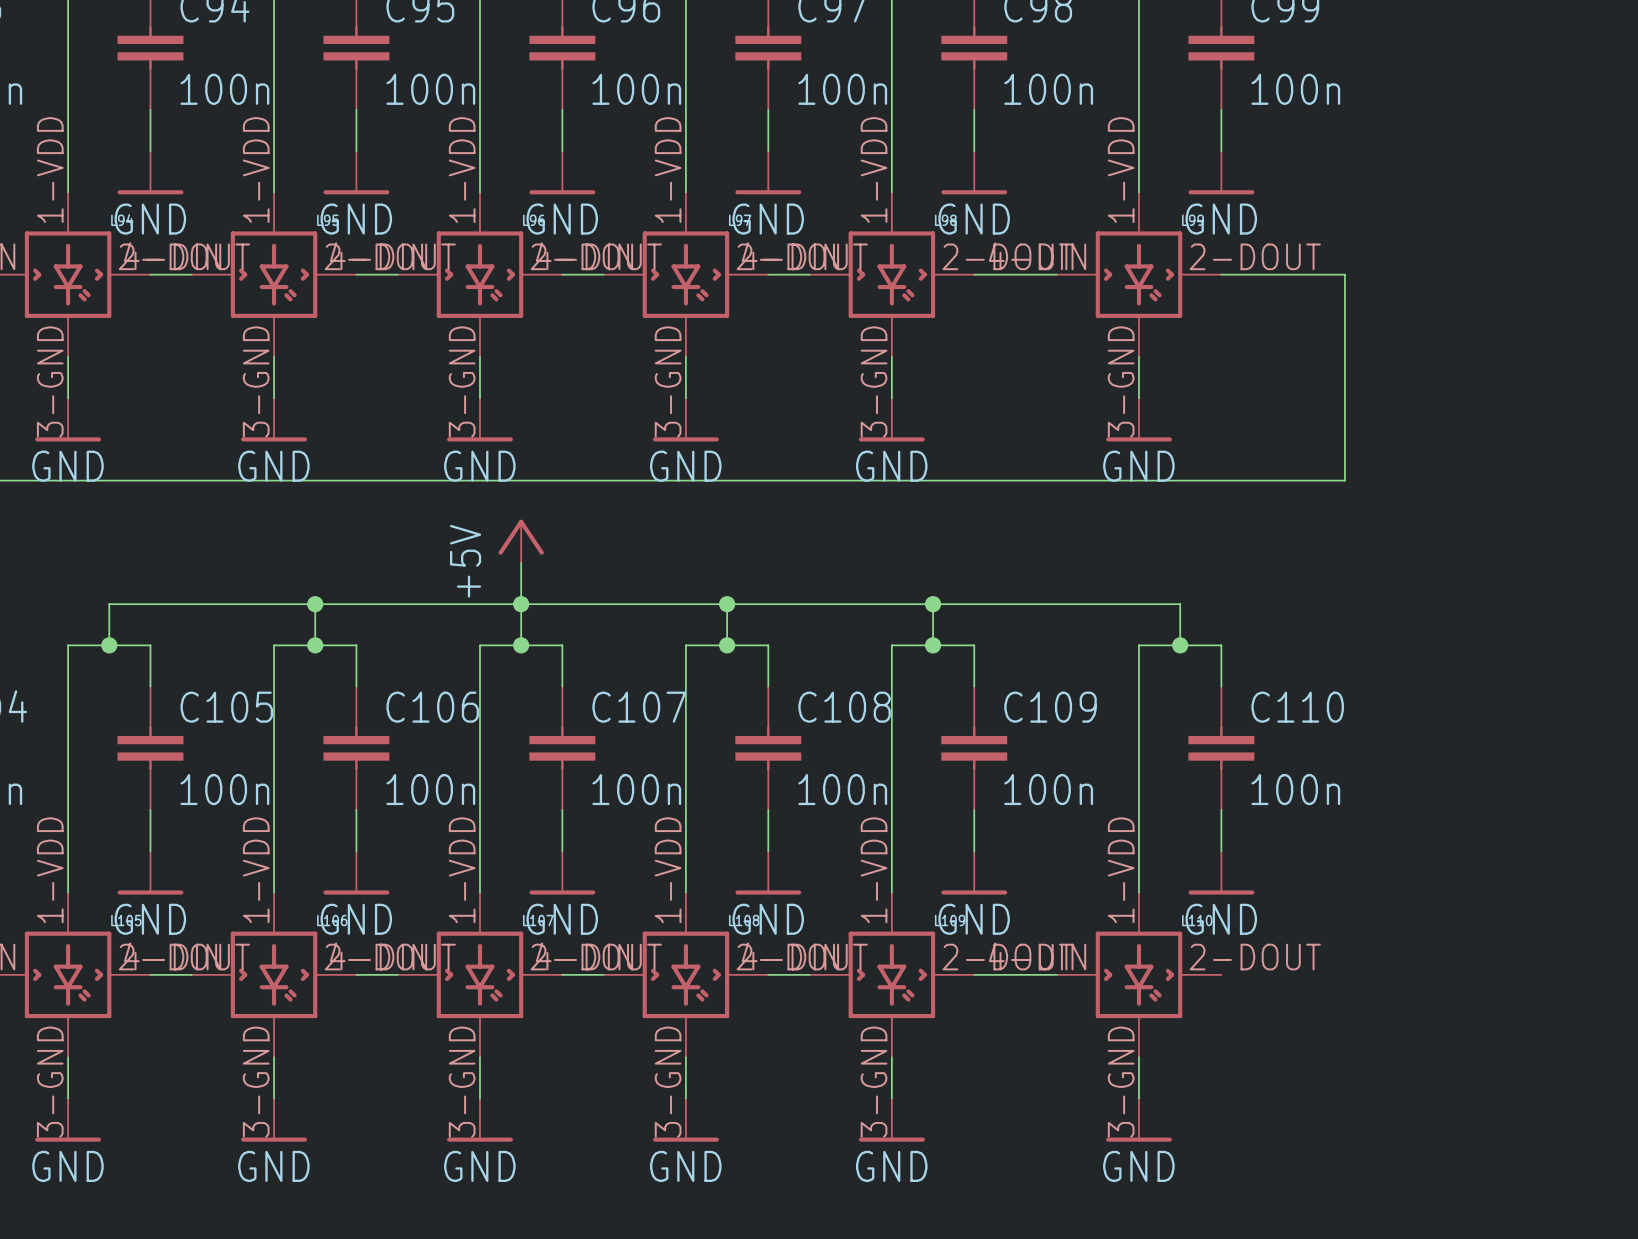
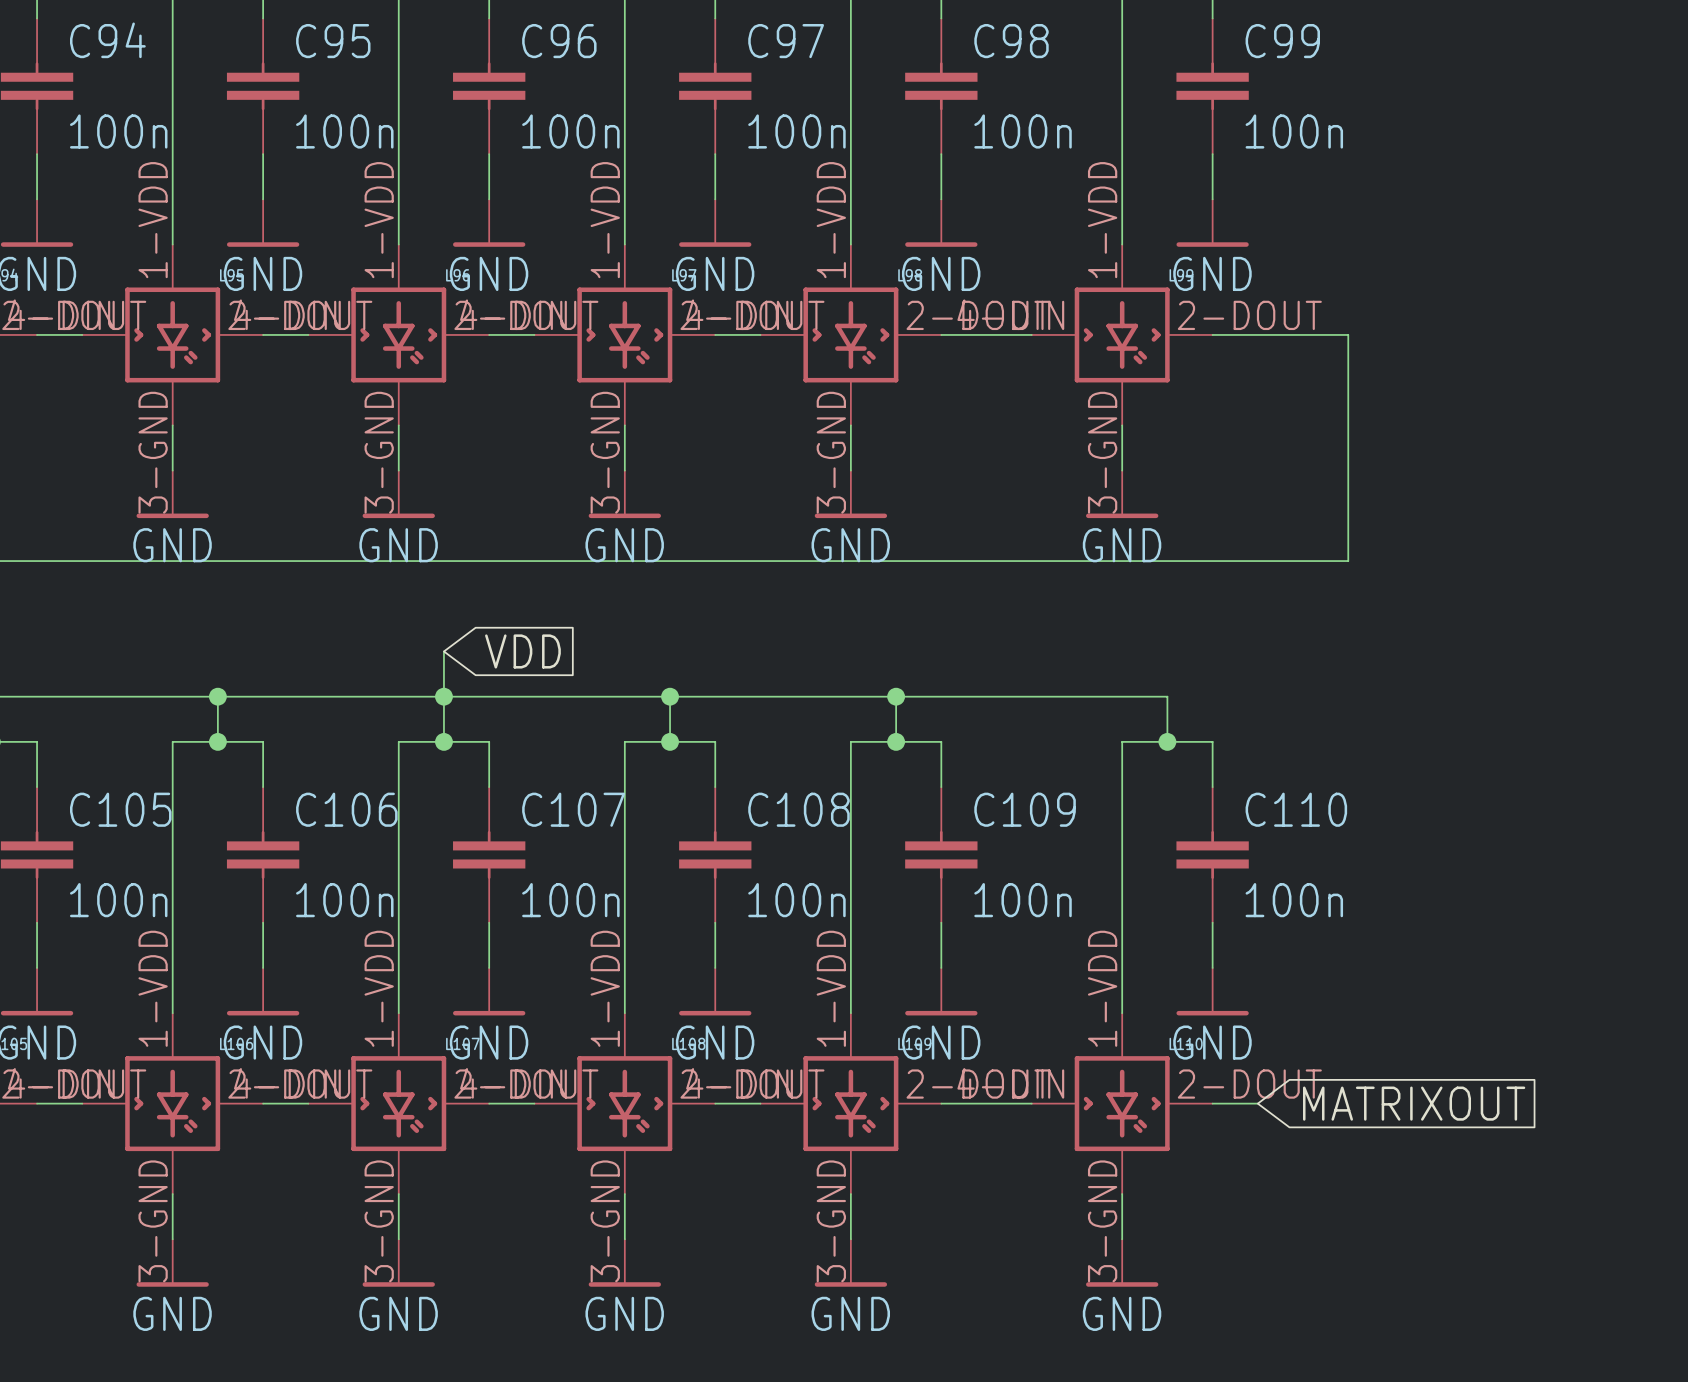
power symbol: +5V (521, 541) -> none
global label: none -> VDD (522, 651)
wire: none -> (1212, 1103) (1257, 1103)
global label: none -> MATRIXOUT (1414, 1103)

